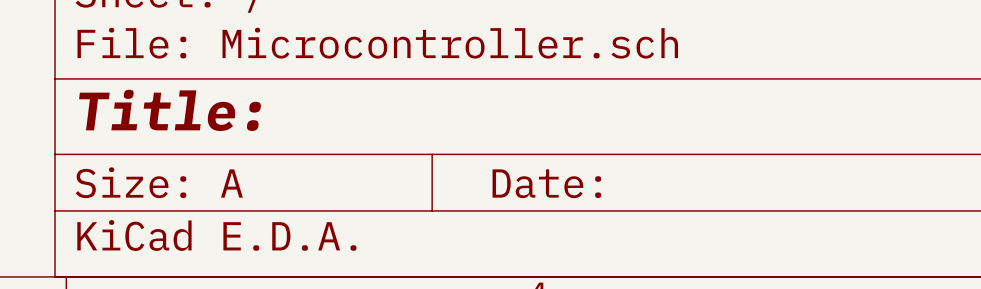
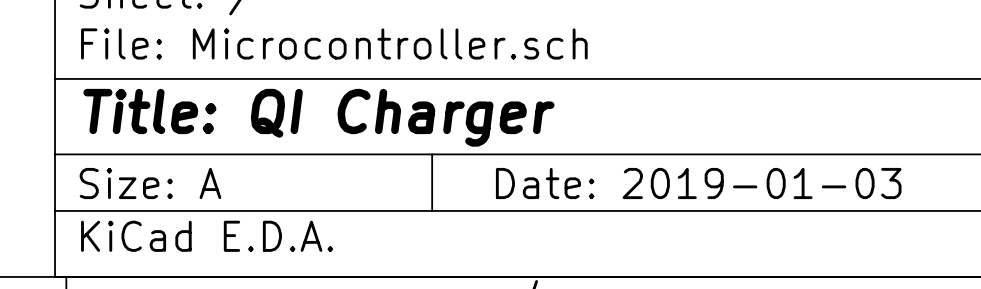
title block: Title: (170, 110) -> Title: QI Charger (318, 117)
title block: Date: (546, 183) -> Date: 2019-01-03 (698, 183)

